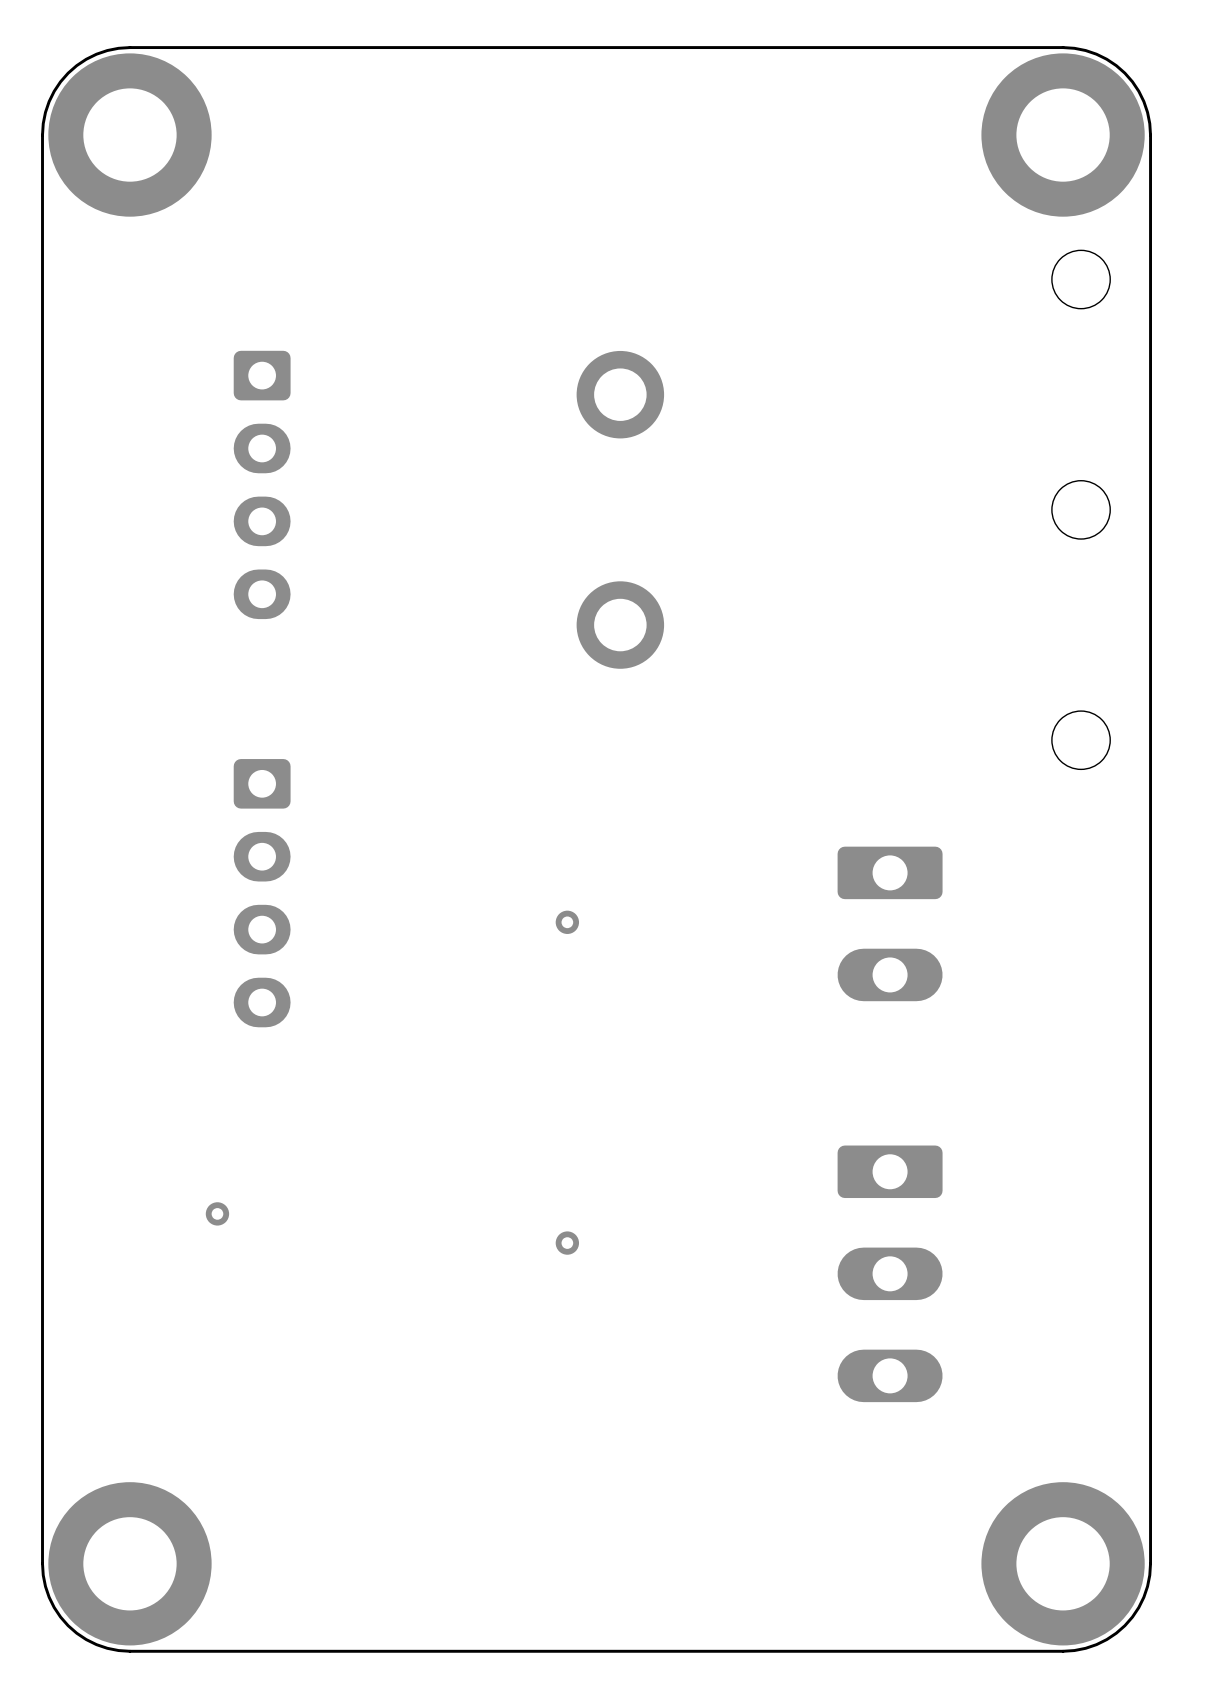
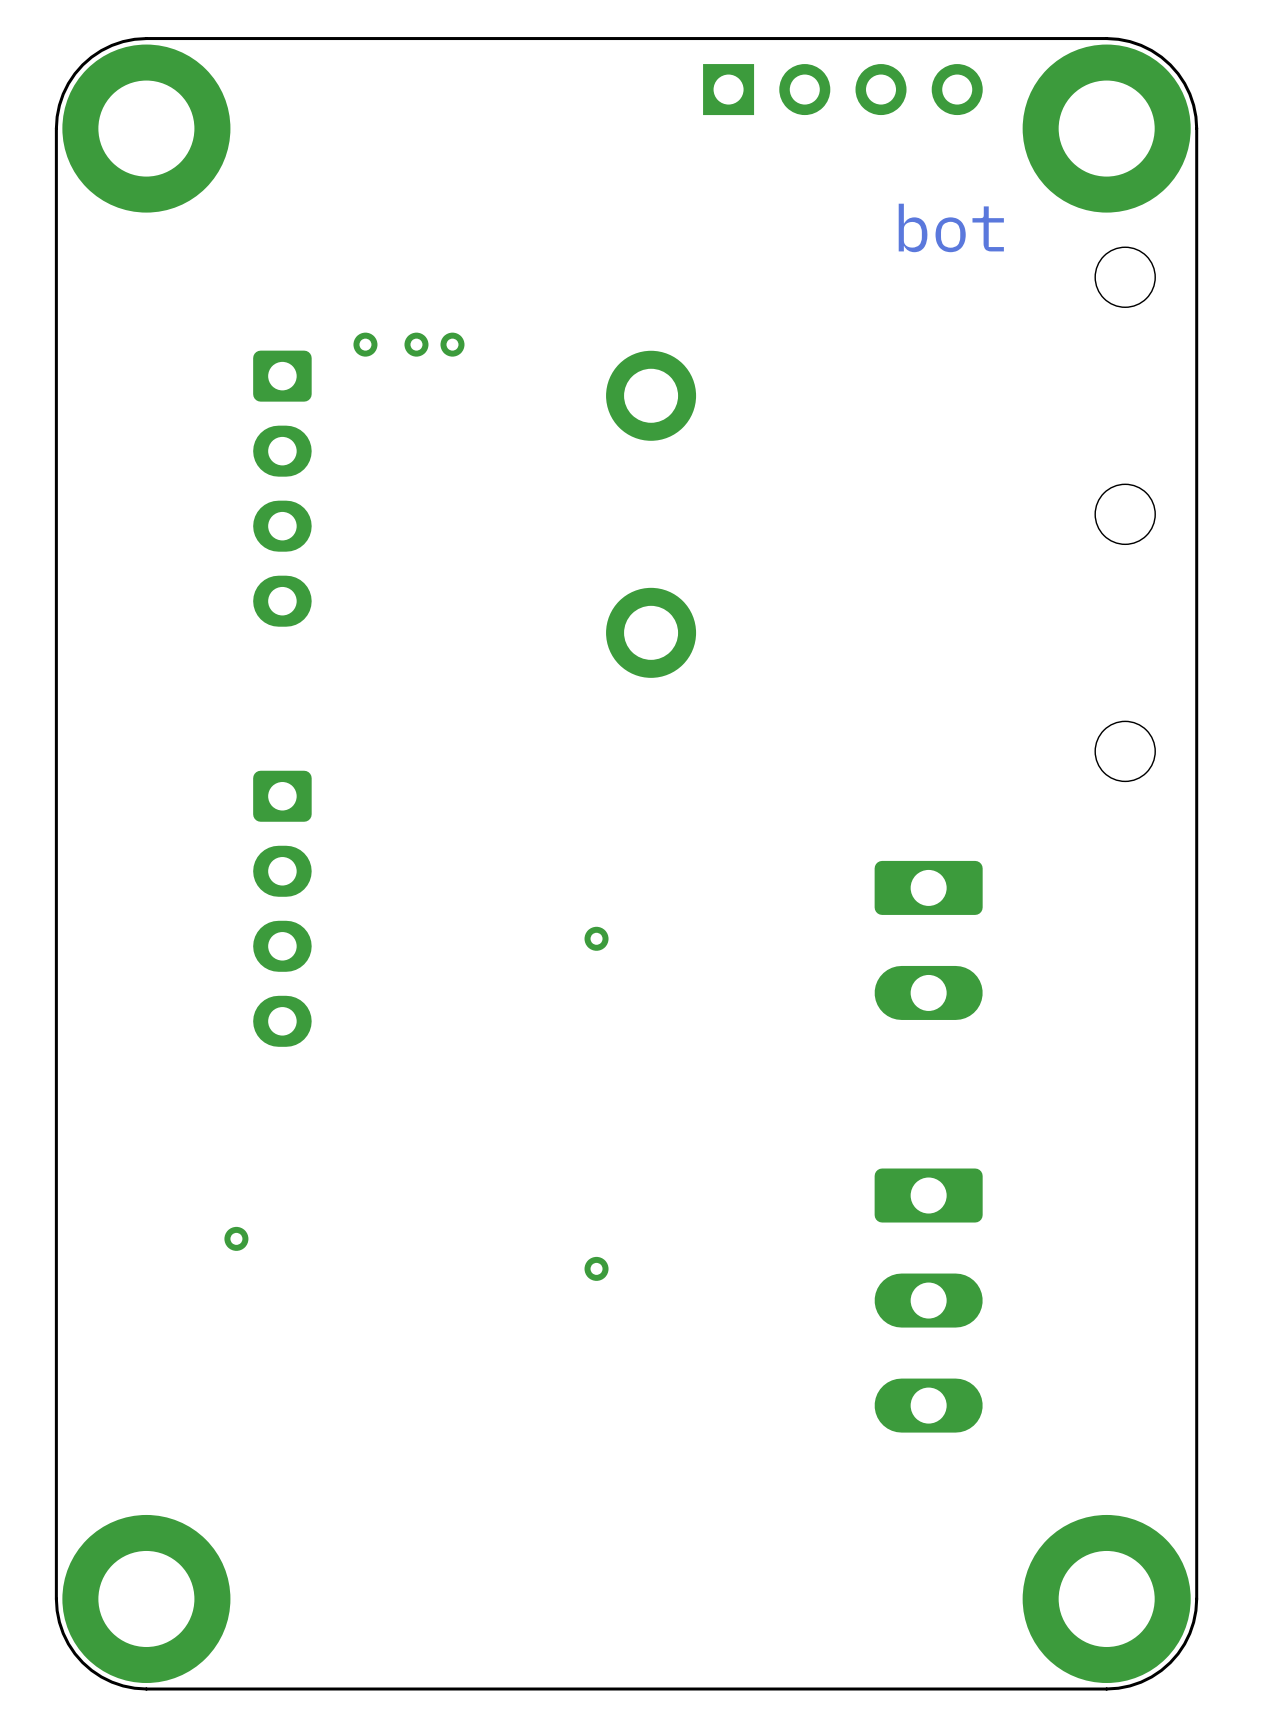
part: none -> (842, 89)
text: none -> bot (951, 227)
via: none -> (365, 344)
via: none -> (416, 344)
via: none -> (452, 344)

